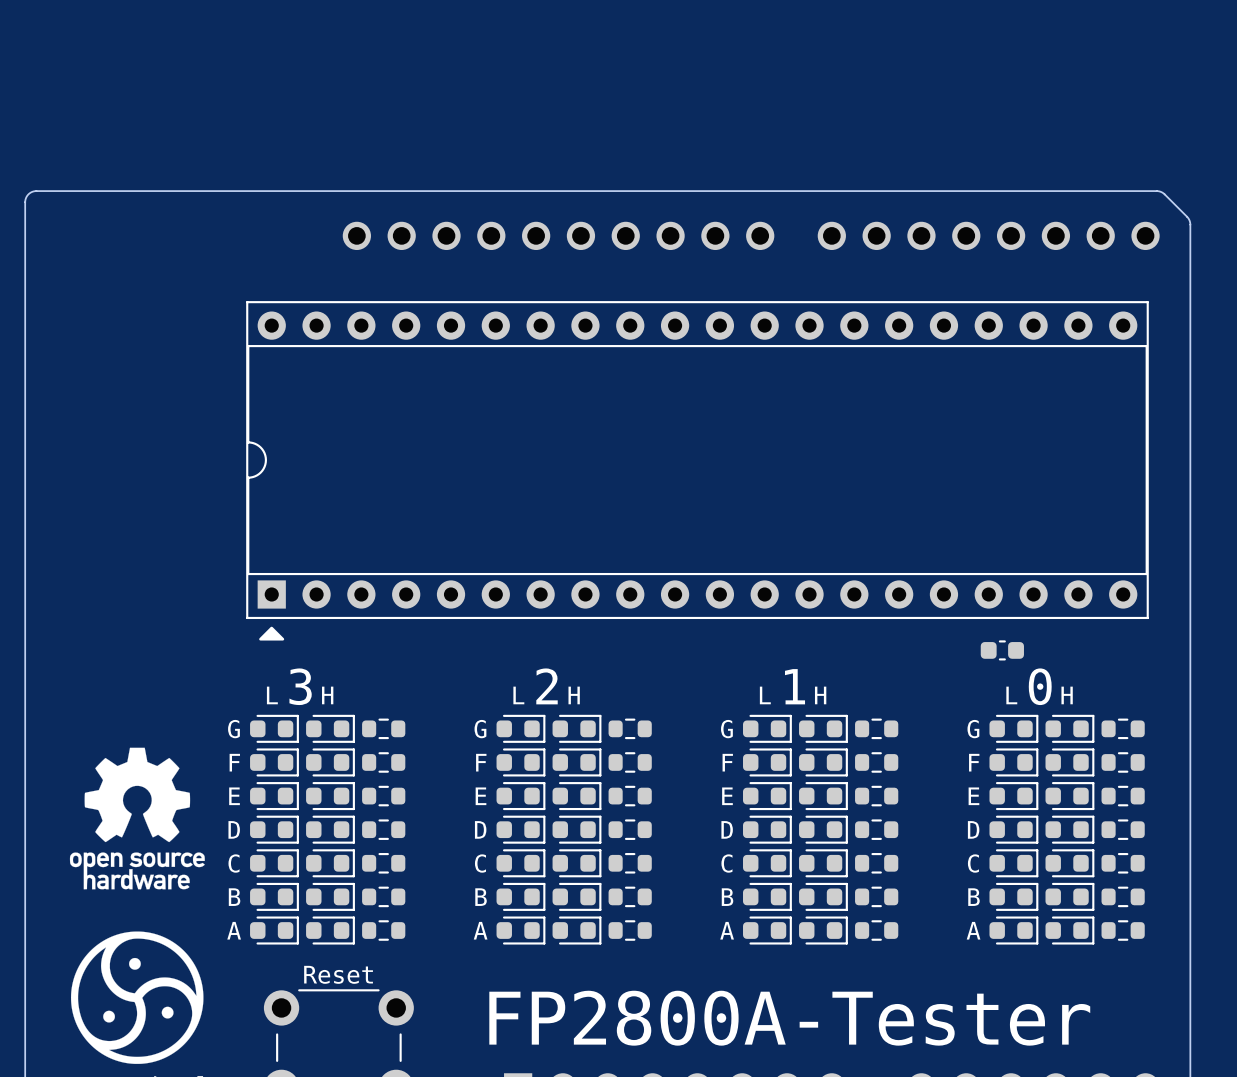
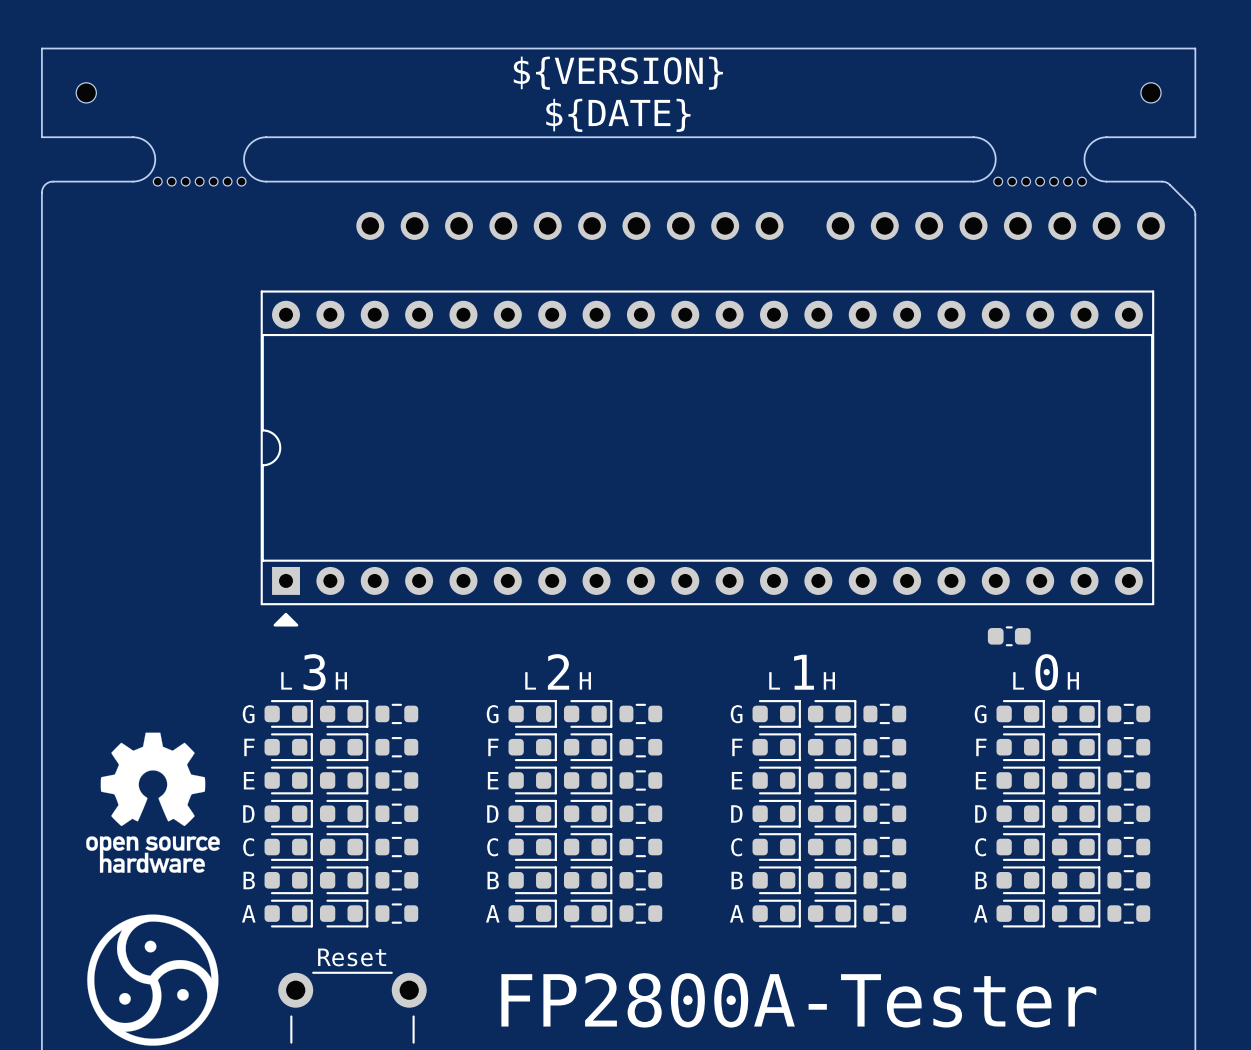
text: none -> ${VERSION} (618, 73)
part: none -> (86, 92)
part: none -> (1150, 92)
text: none -> ${DATE} (618, 115)
board edge: none -> (133, 137) (41, 137) (41, 48) (1195, 48) (1195, 137) (1106, 137)
board edge: none -> (266, 137) (973, 137)
part: none -> (199, 161)
part: none -> (1040, 161)
board edge: (117, 191) (251, 191) -> none
board edge: (966, 191) (1100, 191) -> none

